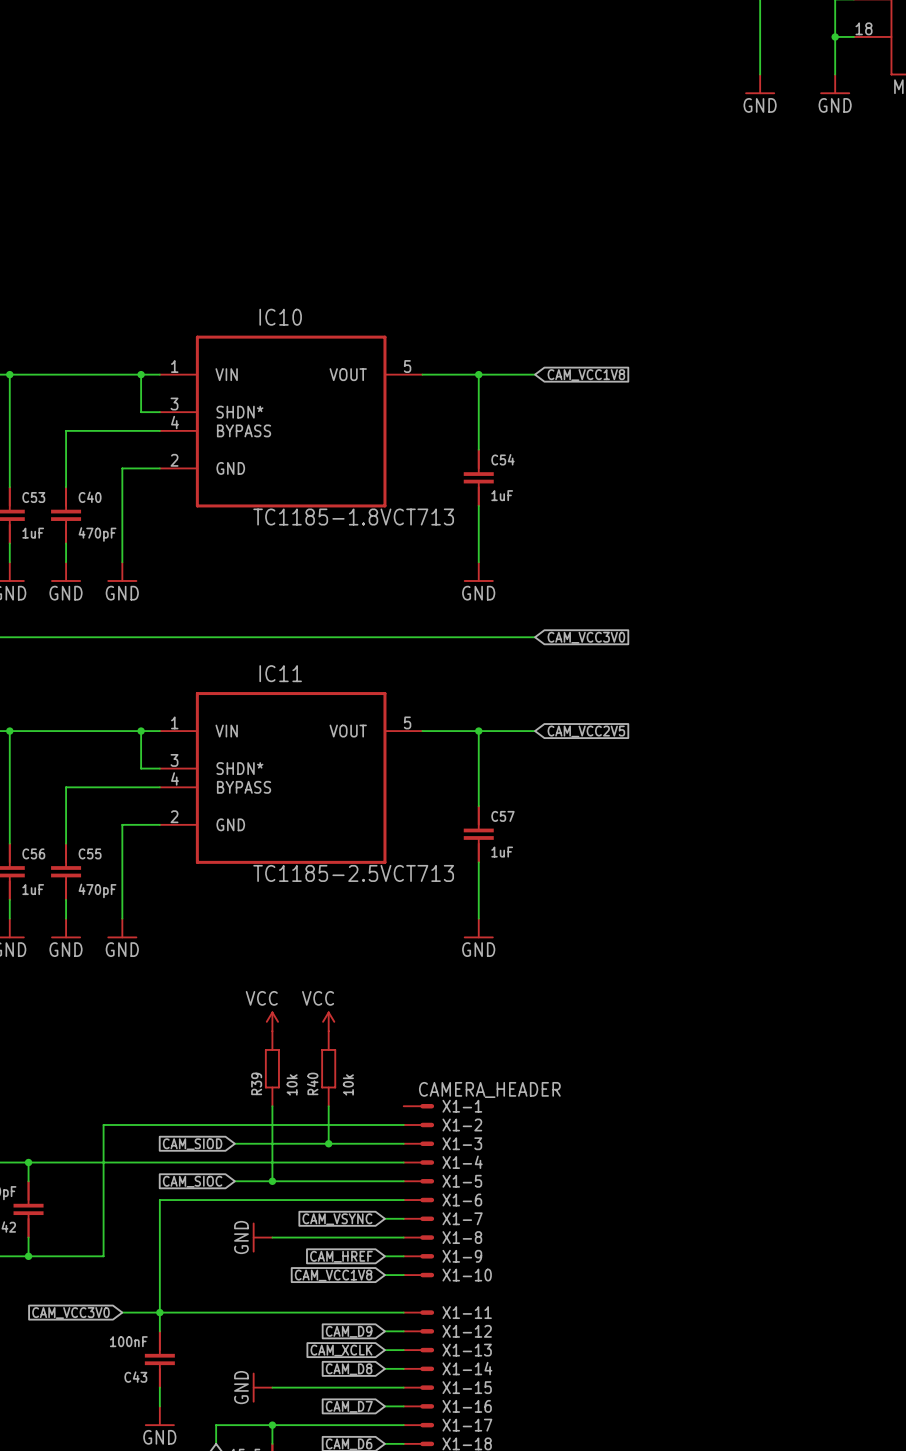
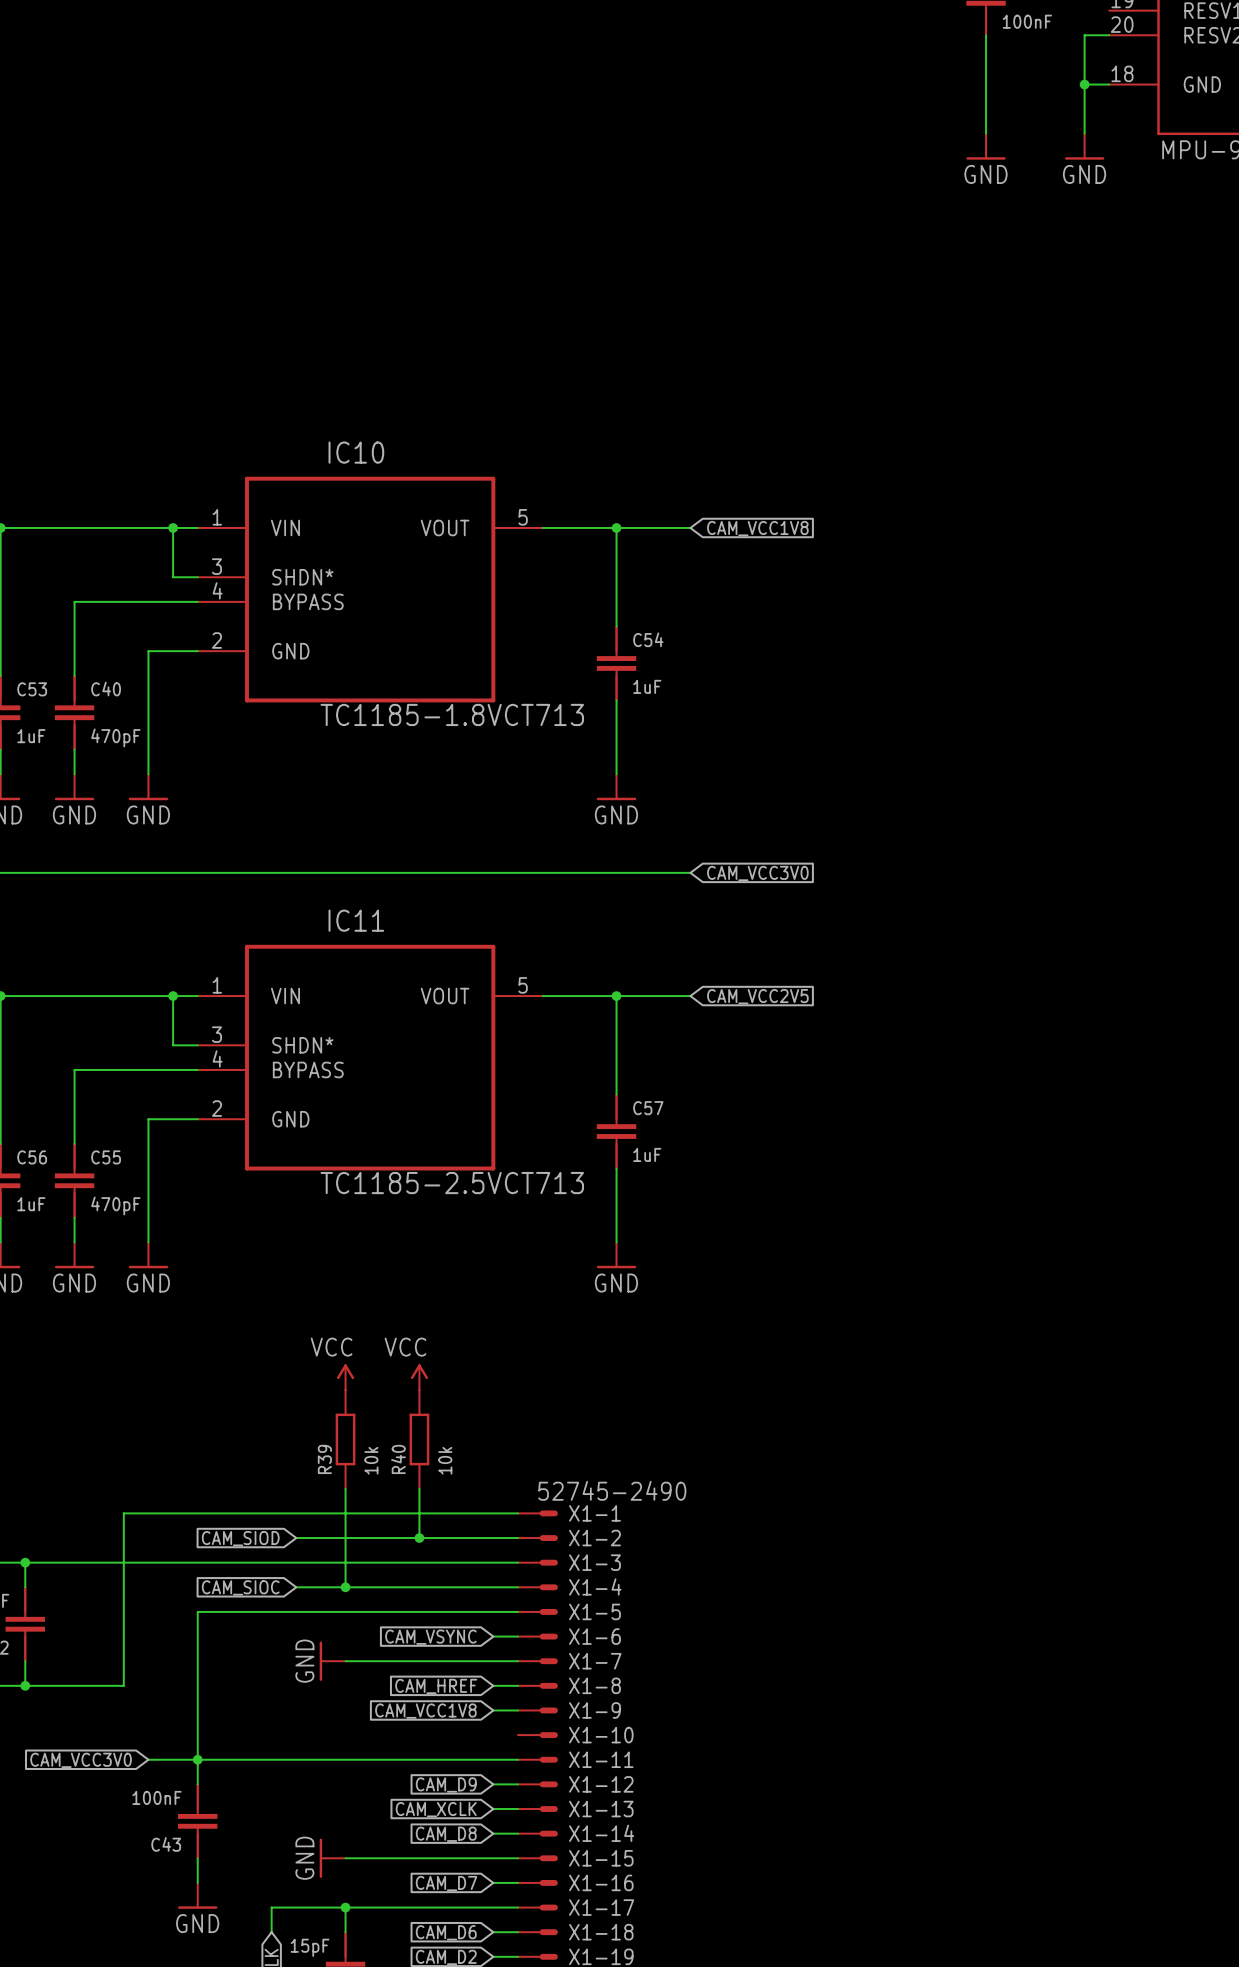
X1-1: CAMERA_HEADER (418, 1106) -> none
X1-2 value: none -> 52745-2490 (612, 1490)
X1-2 name: X1-2 (462, 1124) -> X1-1 (594, 1513)
X1-3 name: X1-3 (462, 1143) -> X1-2 (594, 1538)
X1-4 name: X1-4 (462, 1162) -> X1-3 (594, 1562)
X1-5 name: X1-5 (462, 1181) -> X1-4 (595, 1586)
X1-6 name: X1-6 (462, 1200) -> X1-5 (594, 1611)
X1-7 name: X1-7 (462, 1218) -> X1-6 (594, 1636)
X1-8 name: X1-8 (462, 1237) -> X1-7 (595, 1661)
X1-9 name: X1-9 (462, 1256) -> X1-8 (594, 1685)
X1-10 name: X1-10 (467, 1275) -> X1-9 (594, 1710)
X1-10: none -> (537, 1735)

